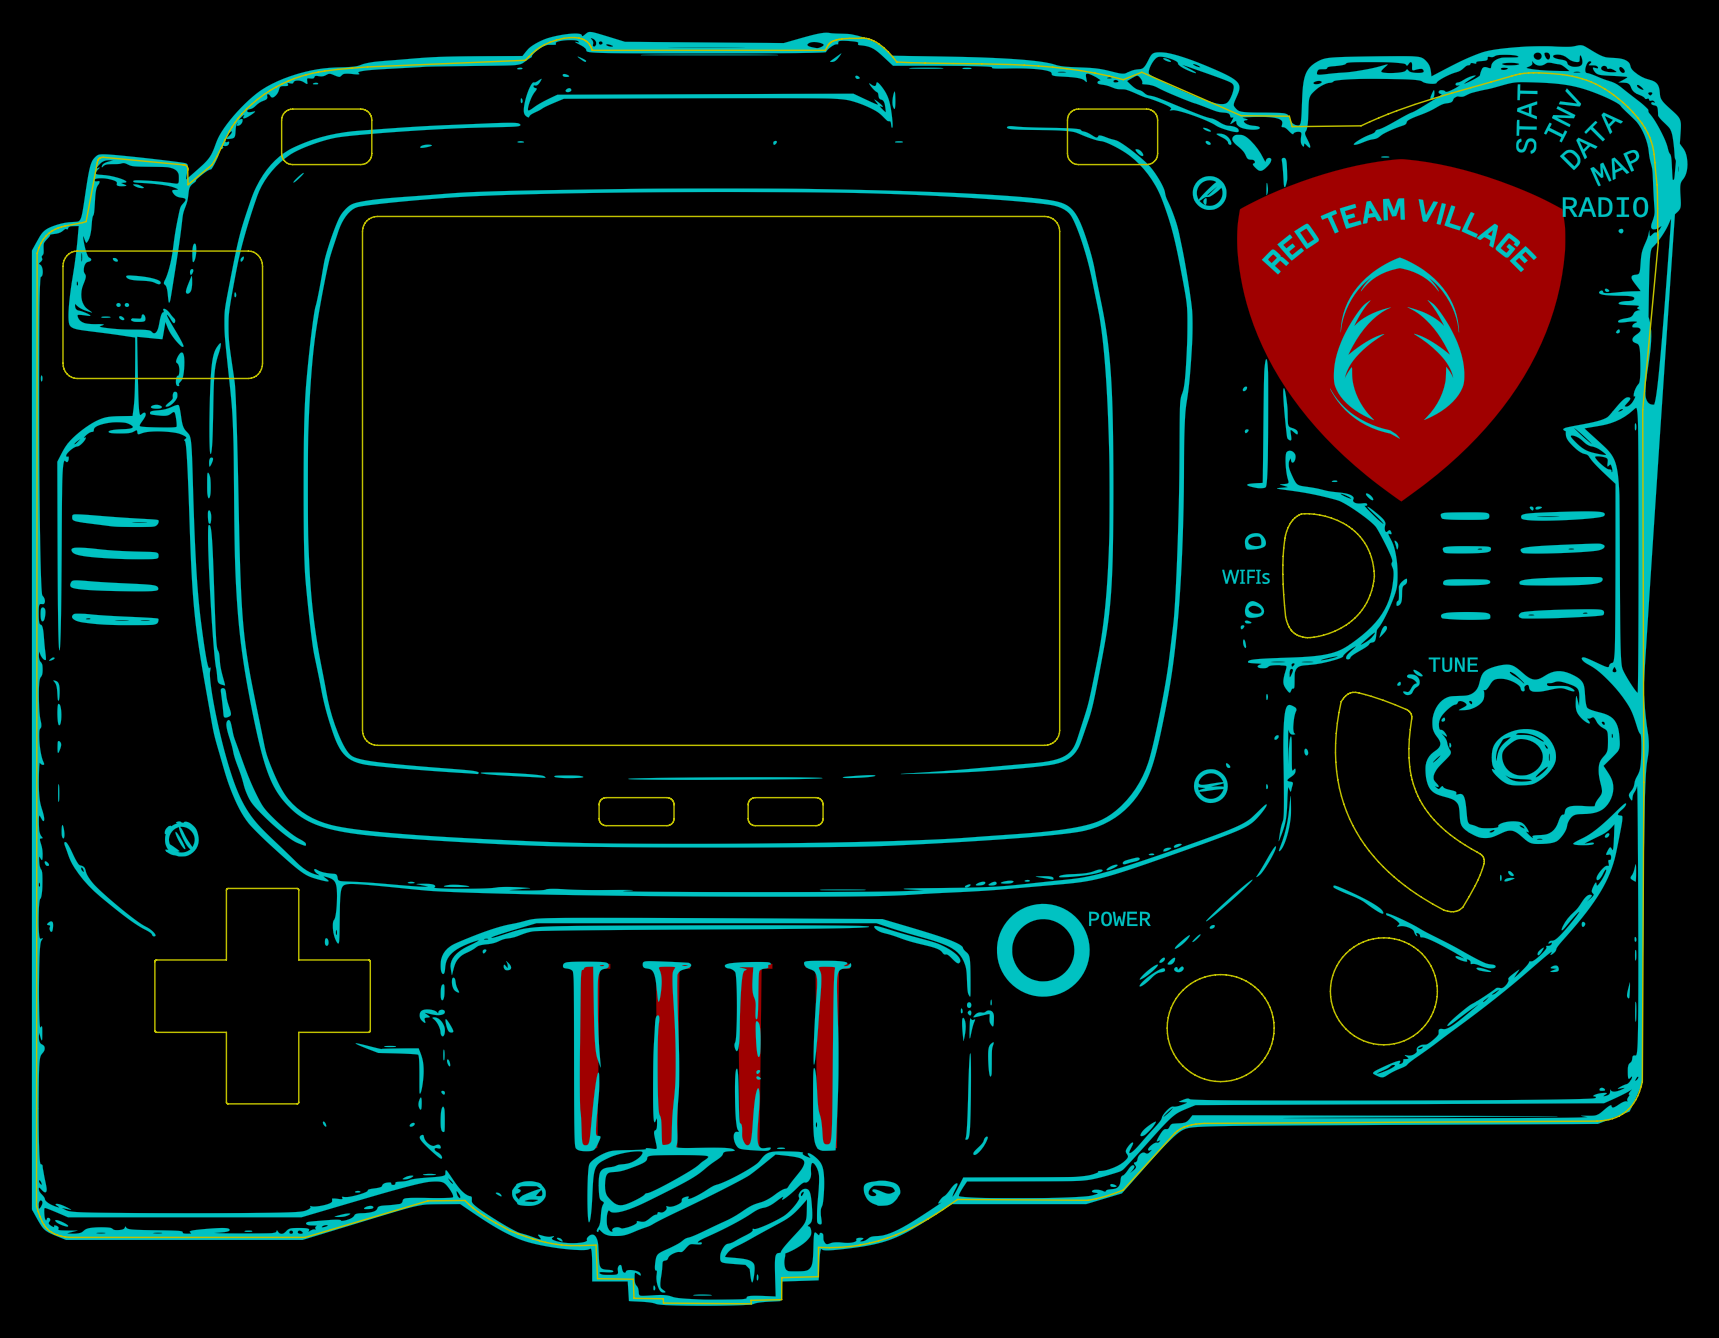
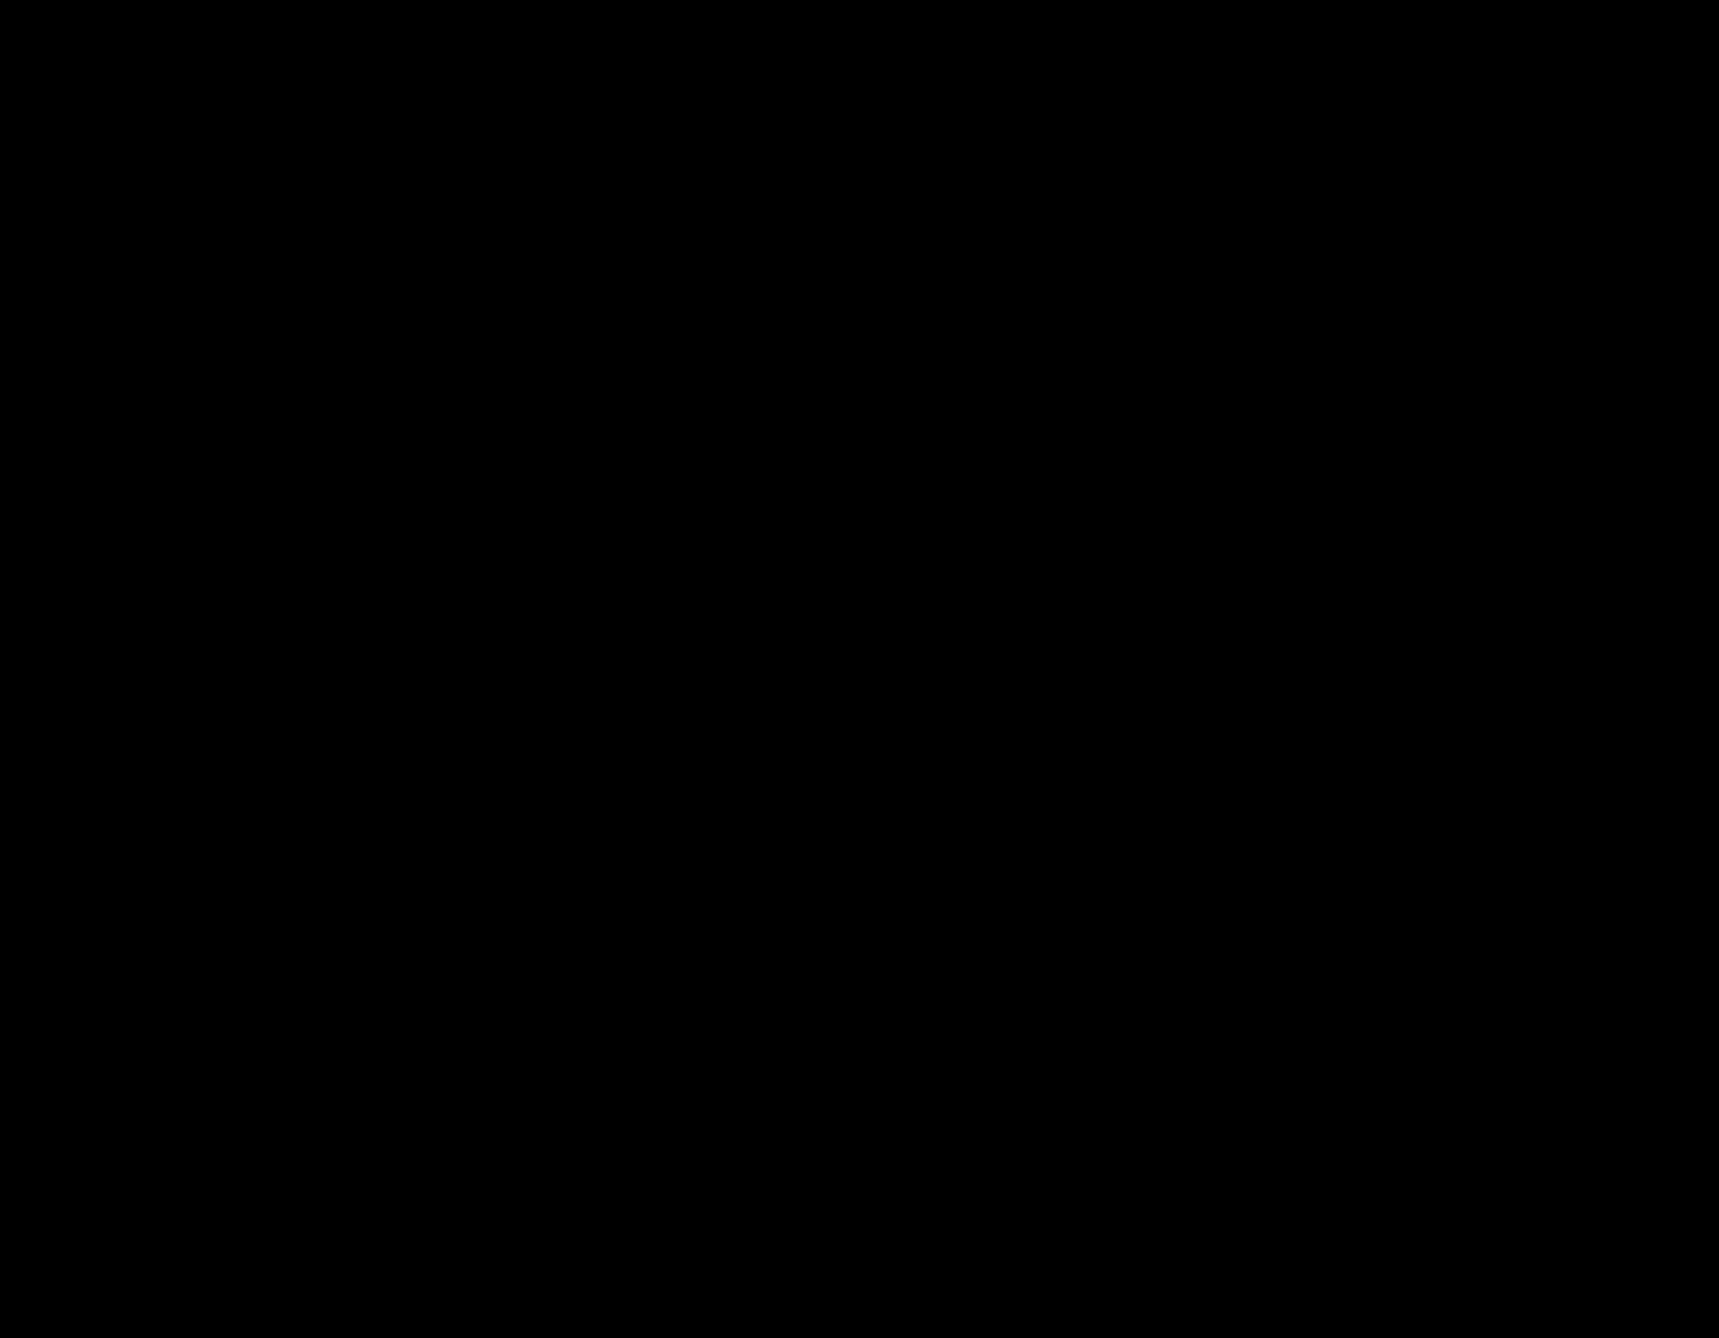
drawing: [31, 31, 1688, 1306] -> none
board edge: (569, 37) (584, 40) (592, 50) (825, 50) (828, 44) (834, 40) (864, 38) (878, 43) (896, 62) (1038, 65) (1080, 70) (1123, 79) (1141, 72) (1241, 115) (1289, 116) (1292, 126) (1361, 125) (1433, 98) (1515, 74) (1528, 72) (1562, 74) (1586, 80) (1609, 91) (1627, 106) (1644, 127) (1652, 146) (1657, 184) (1658, 242) (1642, 409) (1642, 1081) (1637, 1095) (1628, 1109) (1616, 1117) (1597, 1121) (1191, 1124) (1174, 1133) (1123, 1190) (1088, 1200) (957, 1199) (920, 1223) (887, 1238) (850, 1246) (818, 1247) (818, 1276) (781, 1277) (781, 1299) (750, 1300) (751, 1303) (663, 1303) (663, 1298) (633, 1298) (633, 1279) (597, 1278) (596, 1245) (561, 1244) (525, 1236) (489, 1219) (464, 1200) (427, 1200) (305, 1237) (69, 1237) (57, 1235) (47, 1228) (36, 1206) (37, 253) (38, 247) (45, 236) (54, 229) (86, 221) (99, 158) (185, 165) (187, 168) (188, 184) (211, 164) (231, 127) (246, 109) (270, 90) (294, 78) (318, 72) (352, 68) (525, 60) (544, 44) (569, 37) -> none
board edge: (292, 109) (360, 109) (366, 110) (371, 120) (371, 153) (369, 159) (360, 164) (292, 164) (286, 162) (281, 155) (281, 117) (286, 110) (292, 109) -> none
board edge: (1078, 109) (1146, 109) (1152, 110) (1157, 120) (1157, 153) (1155, 159) (1146, 164) (1078, 164) (1072, 162) (1067, 155) (1067, 117) (1072, 110) (1078, 109) -> none
board edge: (377, 216) (1044, 216) (1053, 218) (1058, 225) (1059, 231) (1059, 730) (1057, 738) (1050, 744) (1044, 745) (377, 745) (369, 742) (363, 736) (362, 730) (362, 231) (366, 220) (377, 216) -> none
board edge: (77, 251) (248, 251) (256, 253) (261, 260) (262, 266) (262, 363) (260, 371) (253, 377) (248, 378) (77, 378) (69, 375) (64, 369) (62, 363) (62, 266) (67, 255) (77, 251) -> none
board edge: (1304, 513) (1294, 517) (1286, 531) (1282, 574) (1287, 623) (1294, 633) (1307, 637) (1334, 631) (1354, 618) (1368, 599) (1374, 576) (1368, 549) (1354, 531) (1331, 518) (1304, 513) -> none
board edge: (1352, 692) (1383, 700) (1410, 712) (1411, 718) (1408, 748) (1409, 766) (1418, 796) (1427, 812) (1441, 827) (1483, 857) (1484, 863) (1477, 880) (1462, 907) (1458, 910) (1444, 910) (1415, 893) (1393, 876) (1369, 850) (1349, 818) (1337, 779) (1335, 743) (1341, 701) (1345, 695) (1352, 692) -> none
board edge: (606, 797) (669, 798) (673, 803) (673, 821) (666, 825) (603, 825) (599, 820) (599, 804) (601, 799) (606, 797) -> none
board edge: (755, 797) (818, 798) (822, 803) (822, 821) (816, 825) (752, 825) (748, 820) (748, 804) (750, 799) (755, 797) -> none
board edge: (228, 888) (226, 890) (226, 959) (155, 961) (155, 1031) (226, 1032) (227, 1103) (297, 1103) (298, 1032) (370, 1031) (370, 961) (298, 959) (297, 888) (228, 888) -> none
board edge: (1383, 937) (1363, 941) (1346, 953) (1334, 970) (1330, 991) (1334, 1011) (1346, 1029) (1363, 1040) (1383, 1044) (1404, 1040) (1421, 1029) (1433, 1011) (1437, 991) (1433, 970) (1421, 953) (1404, 941) (1383, 937) -> none
board edge: (1220, 974) (1200, 978) (1182, 990) (1171, 1007) (1167, 1028) (1171, 1048) (1182, 1065) (1199, 1077) (1220, 1081) (1241, 1077) (1258, 1065) (1269, 1048) (1274, 1028) (1269, 1007) (1258, 990) (1241, 978) (1220, 974) -> none

